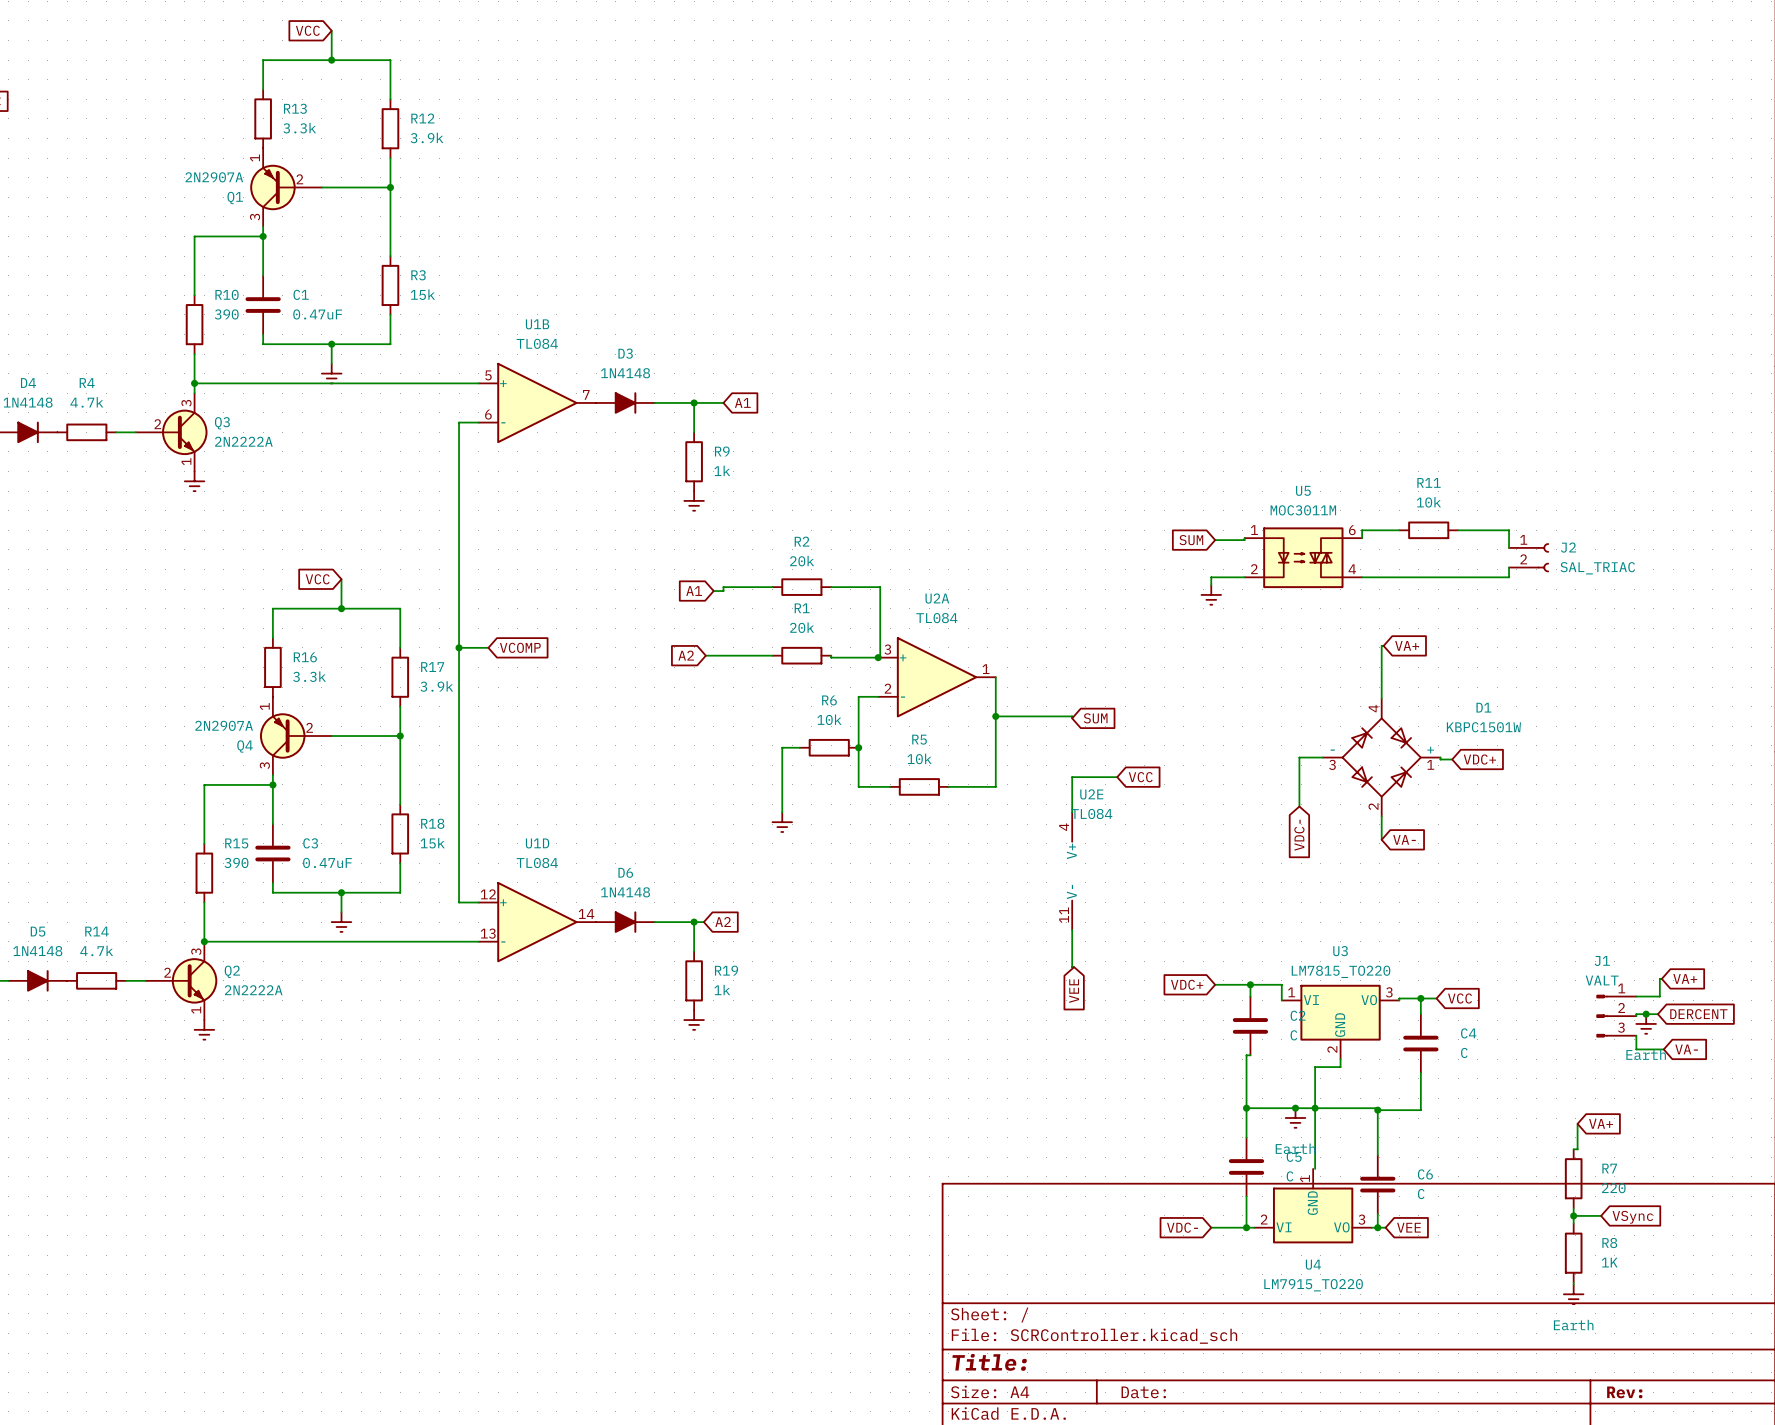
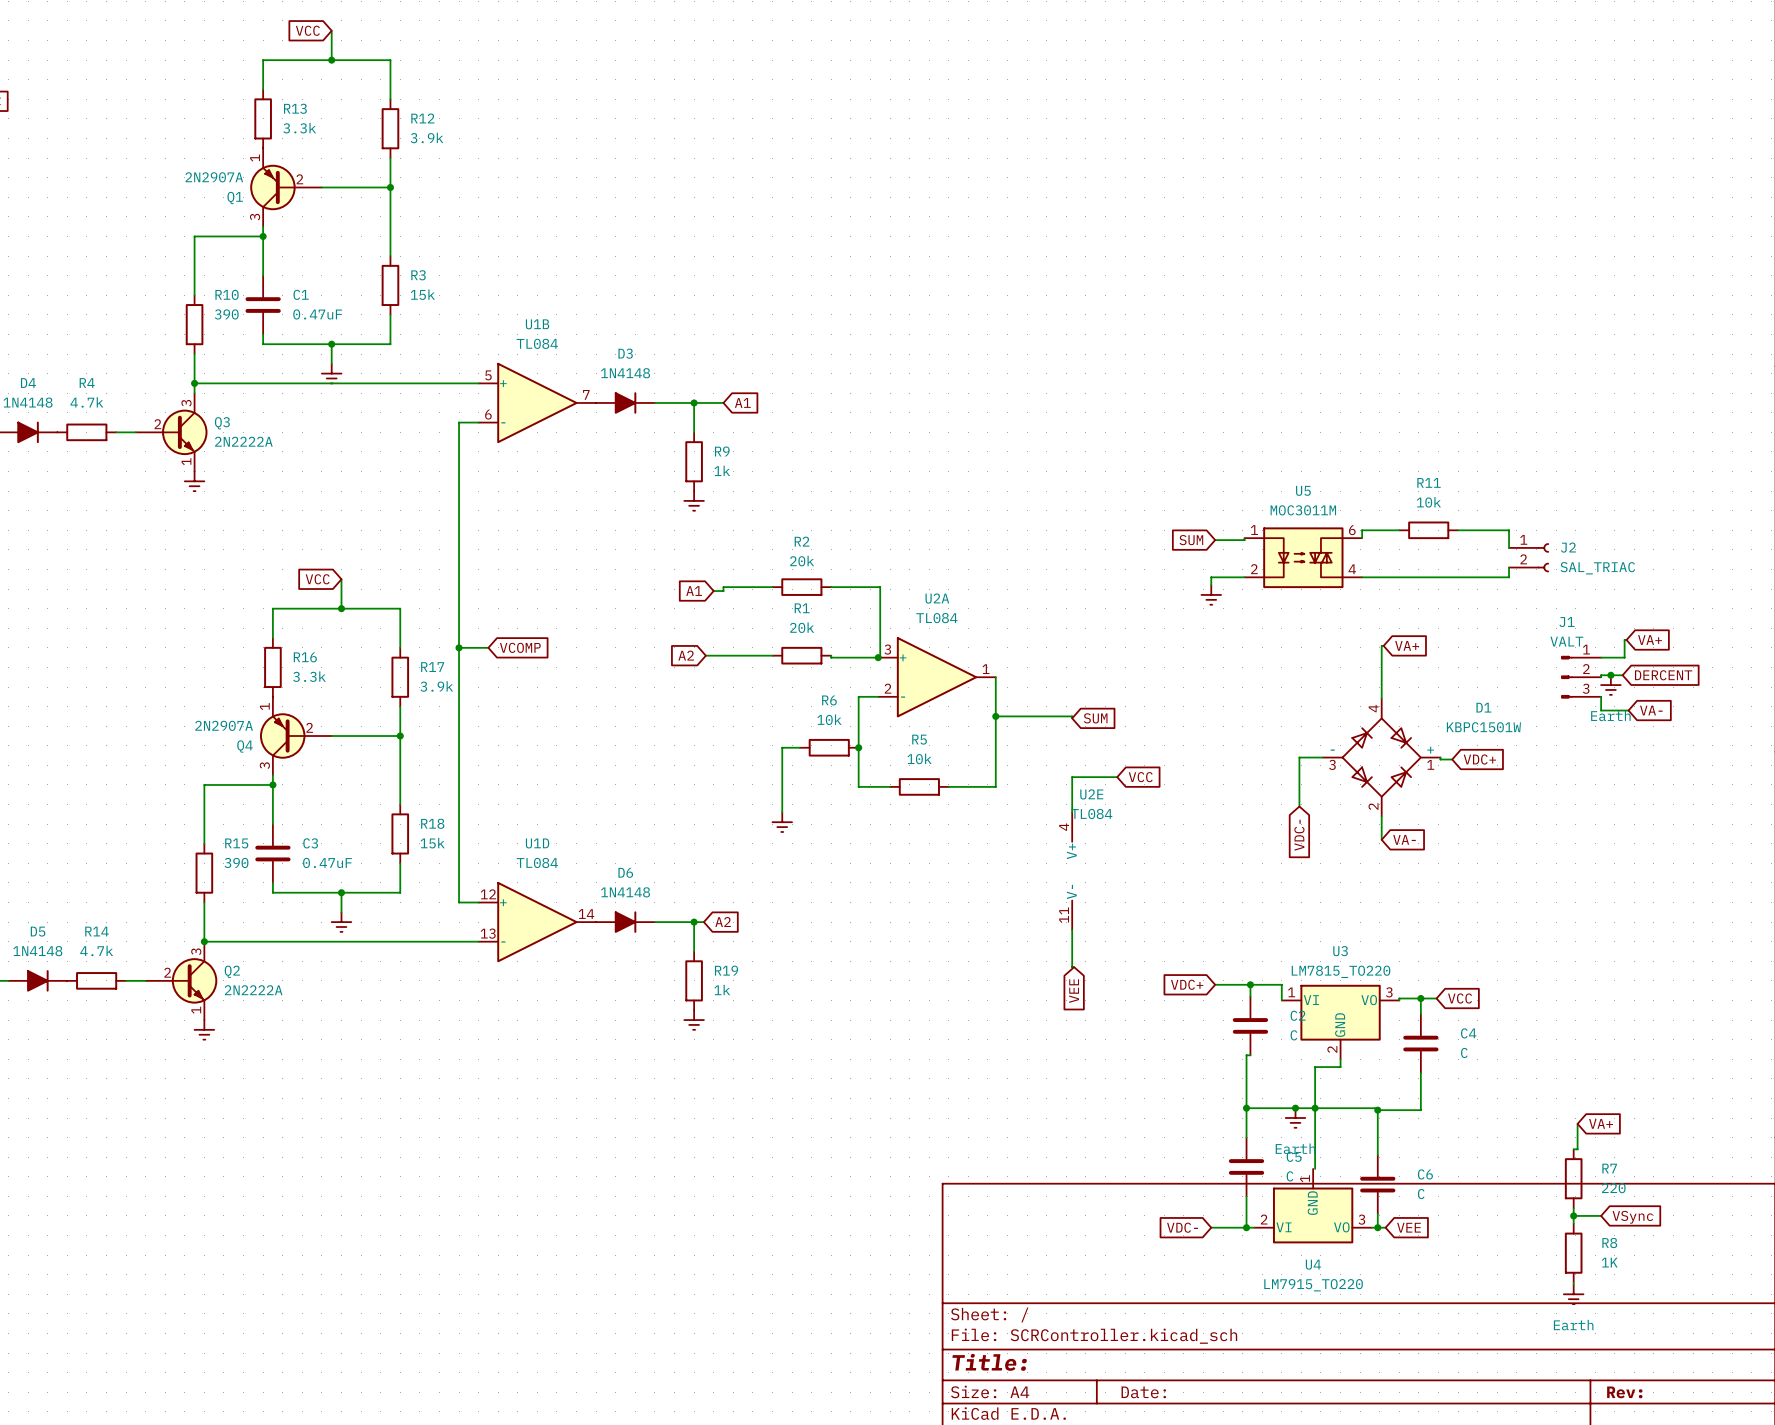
wire: none -> (1626, 640) (1624, 640) (1624, 657) (1601, 657)
global label: none -> VA+ (1650, 640)
junction: none -> (1610, 675)
wire: none -> (1622, 675) (1601, 675) (1601, 677)
global label: none -> DERCENT (1663, 675)
power symbol: none -> Earth (1610, 685)
wire: none -> (1601, 696) (1601, 710) (1628, 710)
global label: none -> VA- (1651, 710)
wire: (1661, 978) (1659, 978) (1659, 996) (1636, 996) -> none
global label: VA+ (1685, 978) -> none
junction: (1646, 1014) -> none
wire: (1657, 1014) (1636, 1014) (1636, 1016) -> none
global label: DERCENT (1698, 1014) -> none
J1 position: (1616, 1016) -> (1581, 677)
power symbol: Earth (1646, 1023) -> none
wire: (1636, 1035) (1636, 1049) (1663, 1049) -> none
global label: VA- (1686, 1049) -> none

